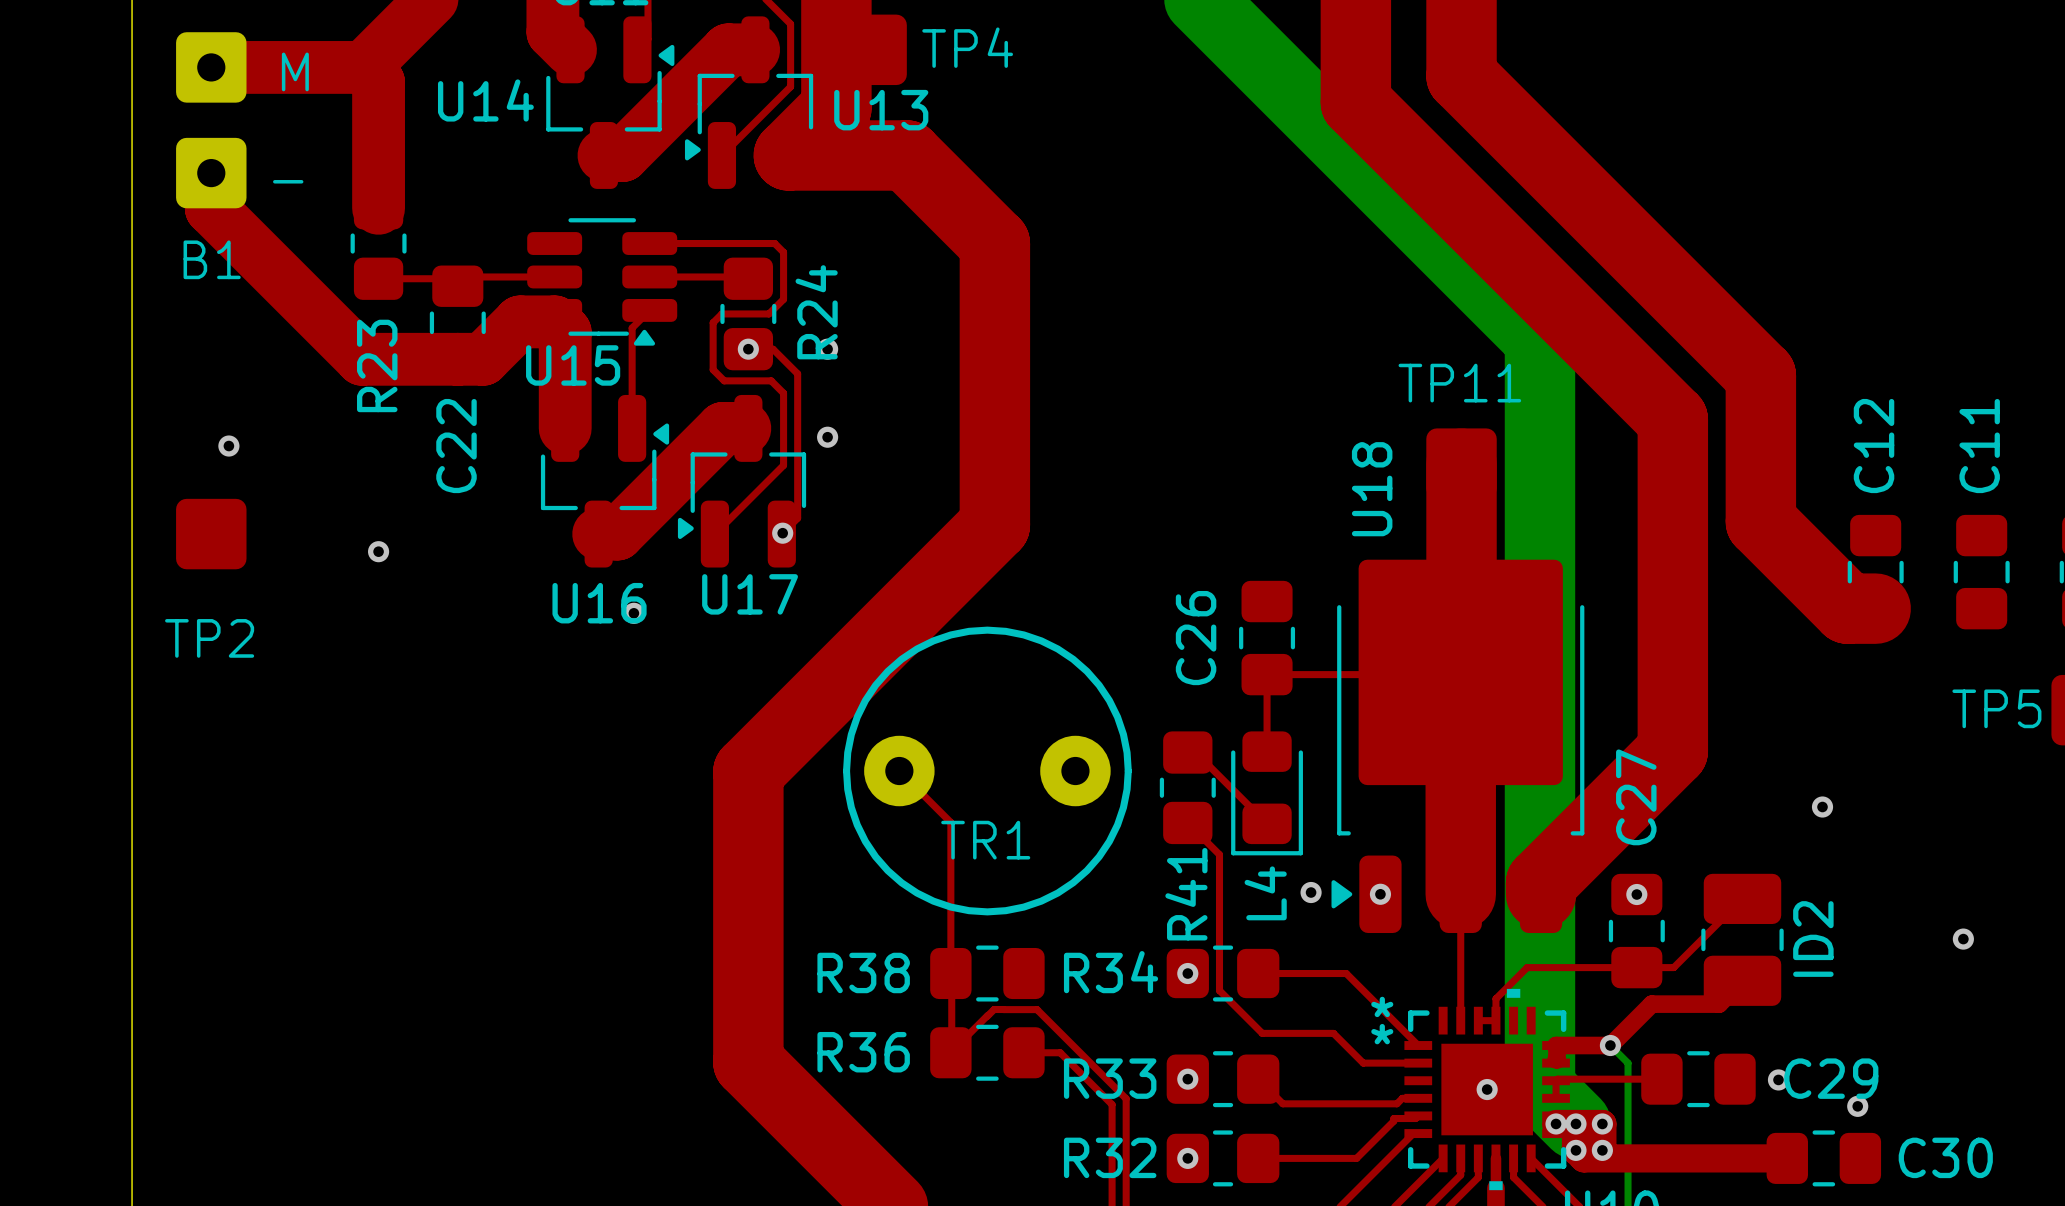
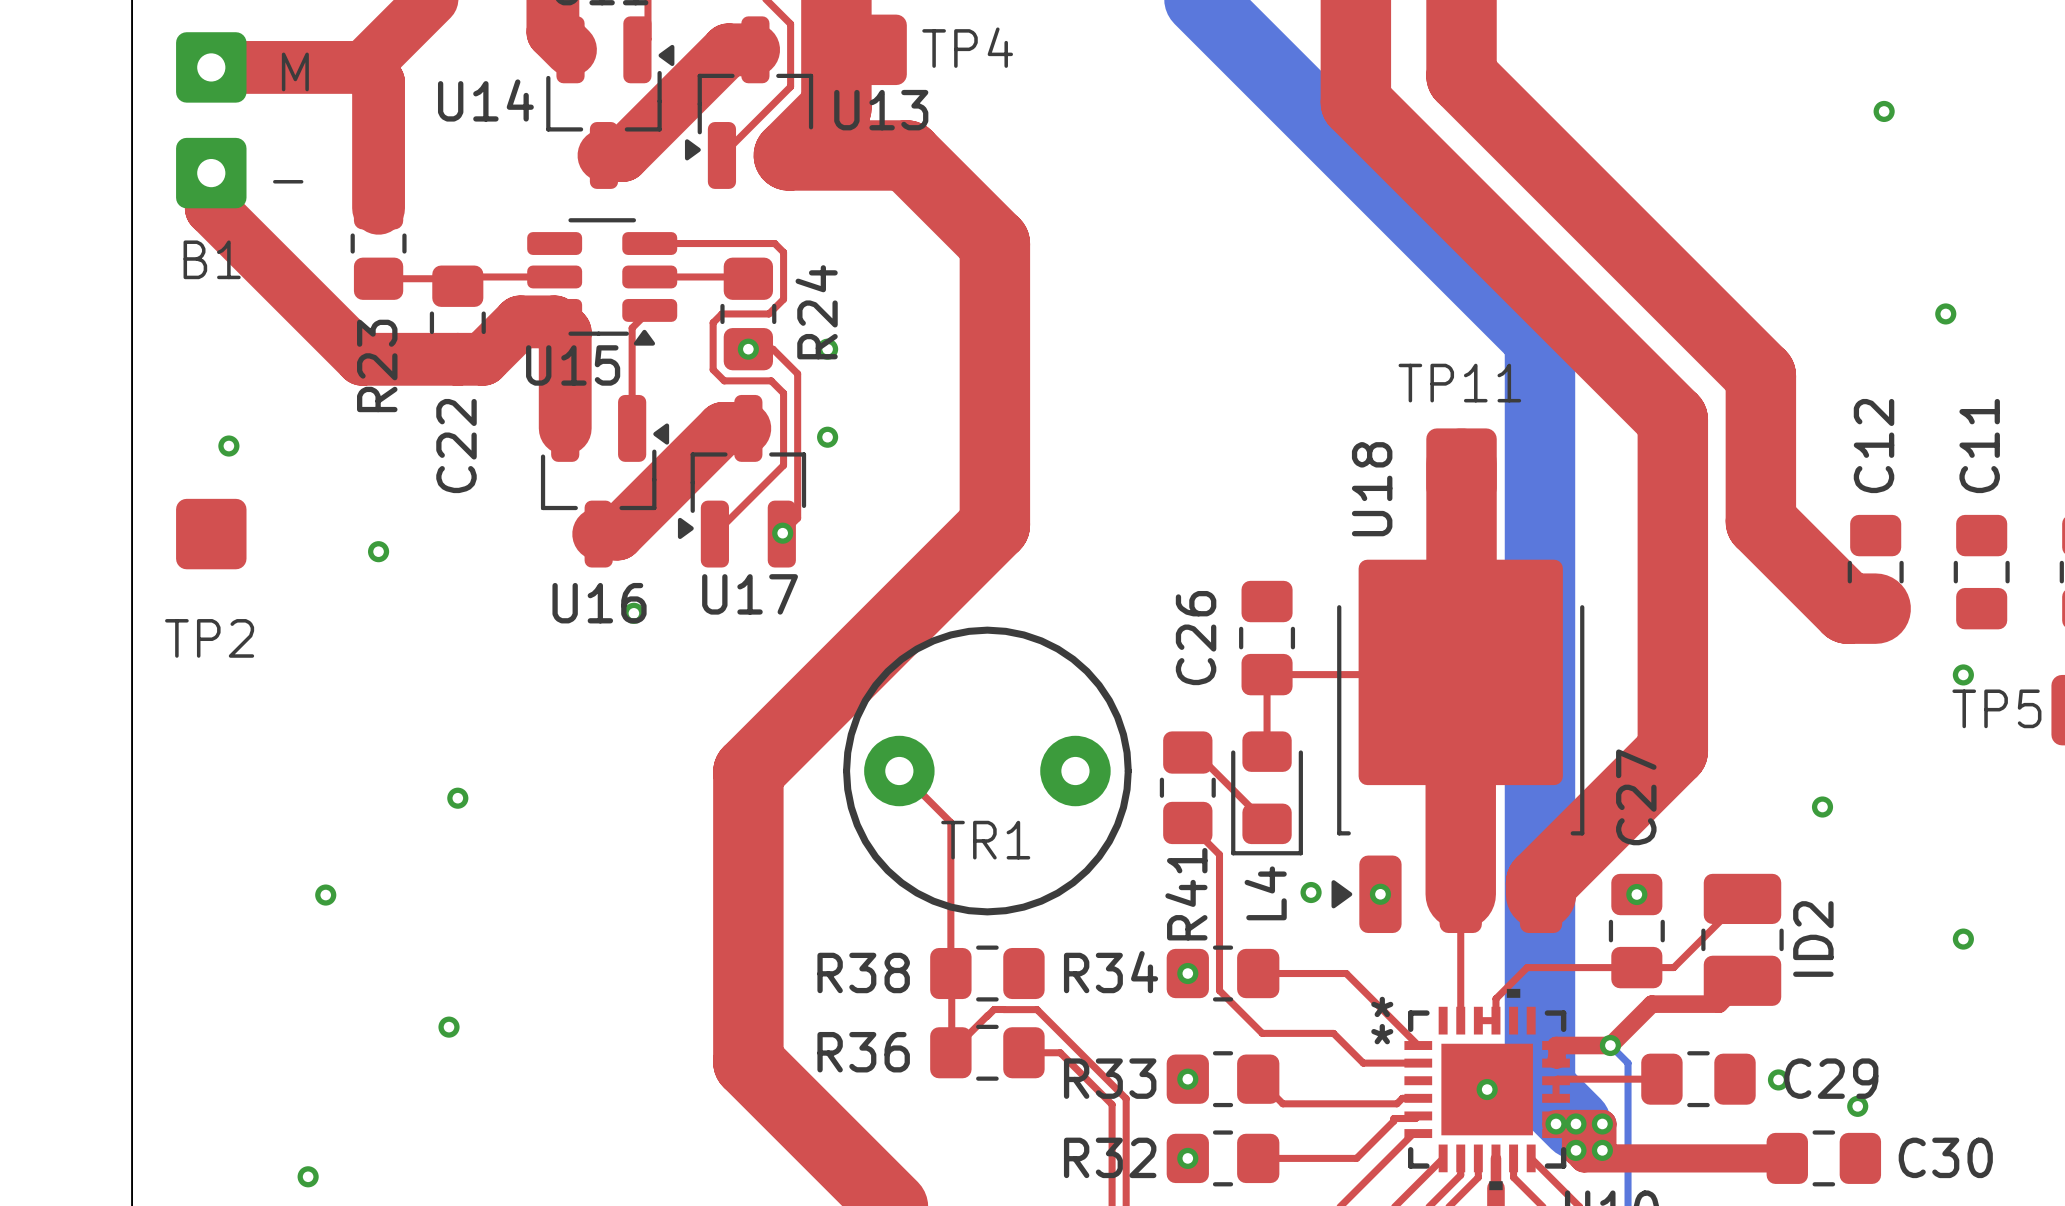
via: none -> (1884, 111)
via: none -> (1945, 313)
via: none -> (1963, 674)
via: none -> (457, 798)
via: none -> (325, 895)
via: none -> (449, 1027)
via: none -> (308, 1176)

